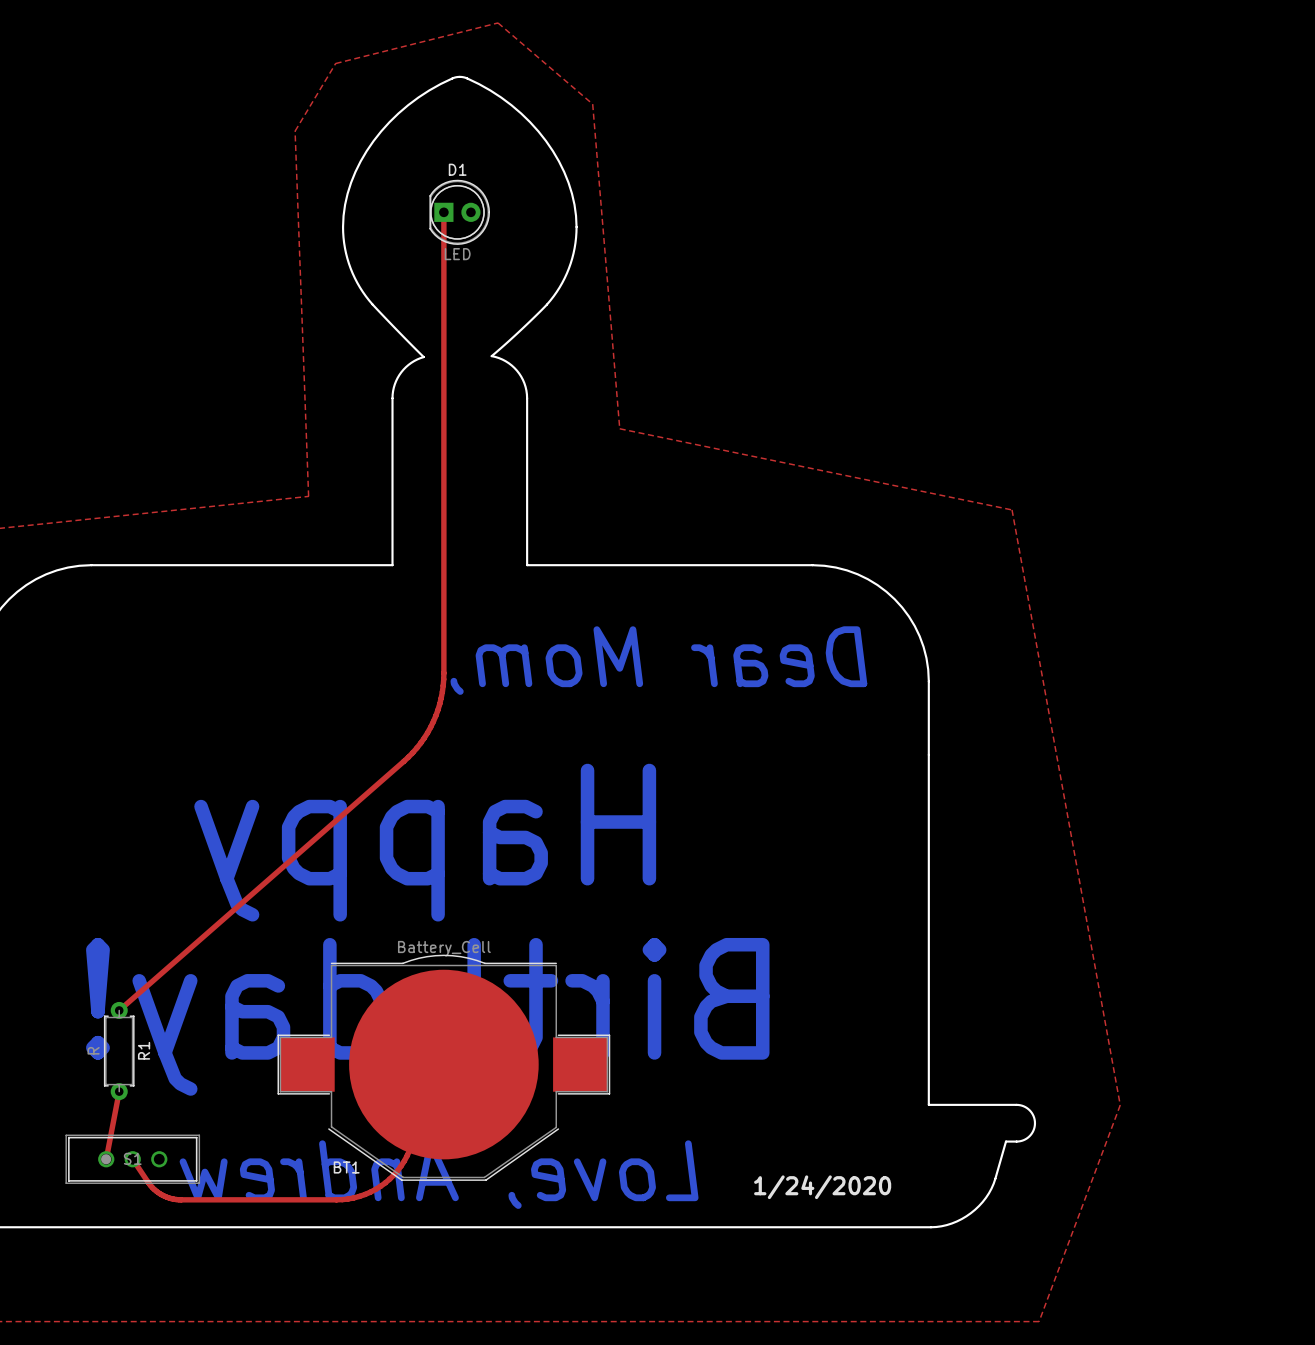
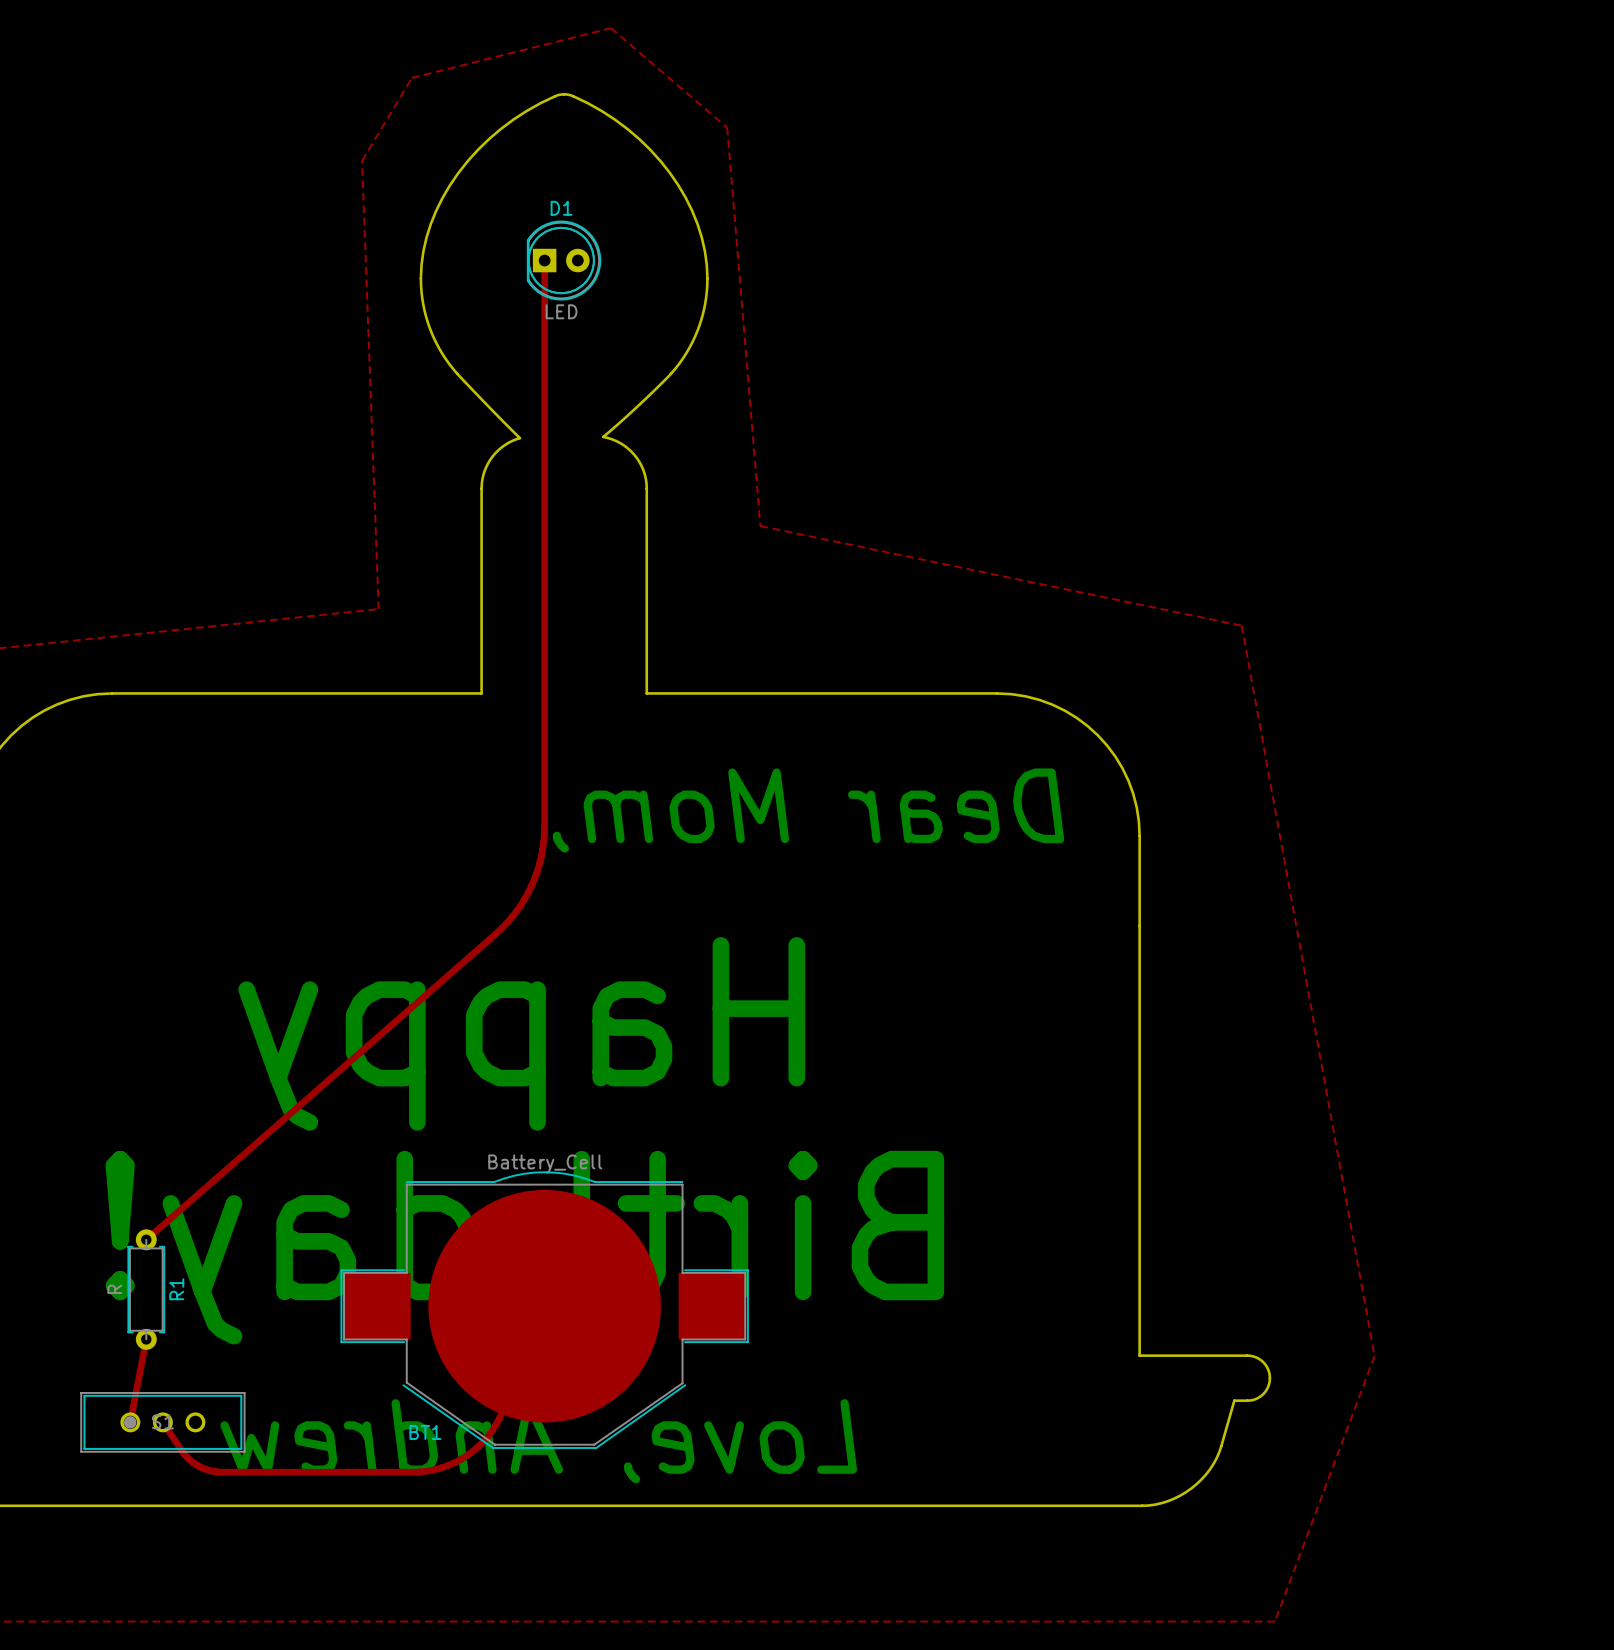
text: 1/24/2020 (822, 1187) -> none

